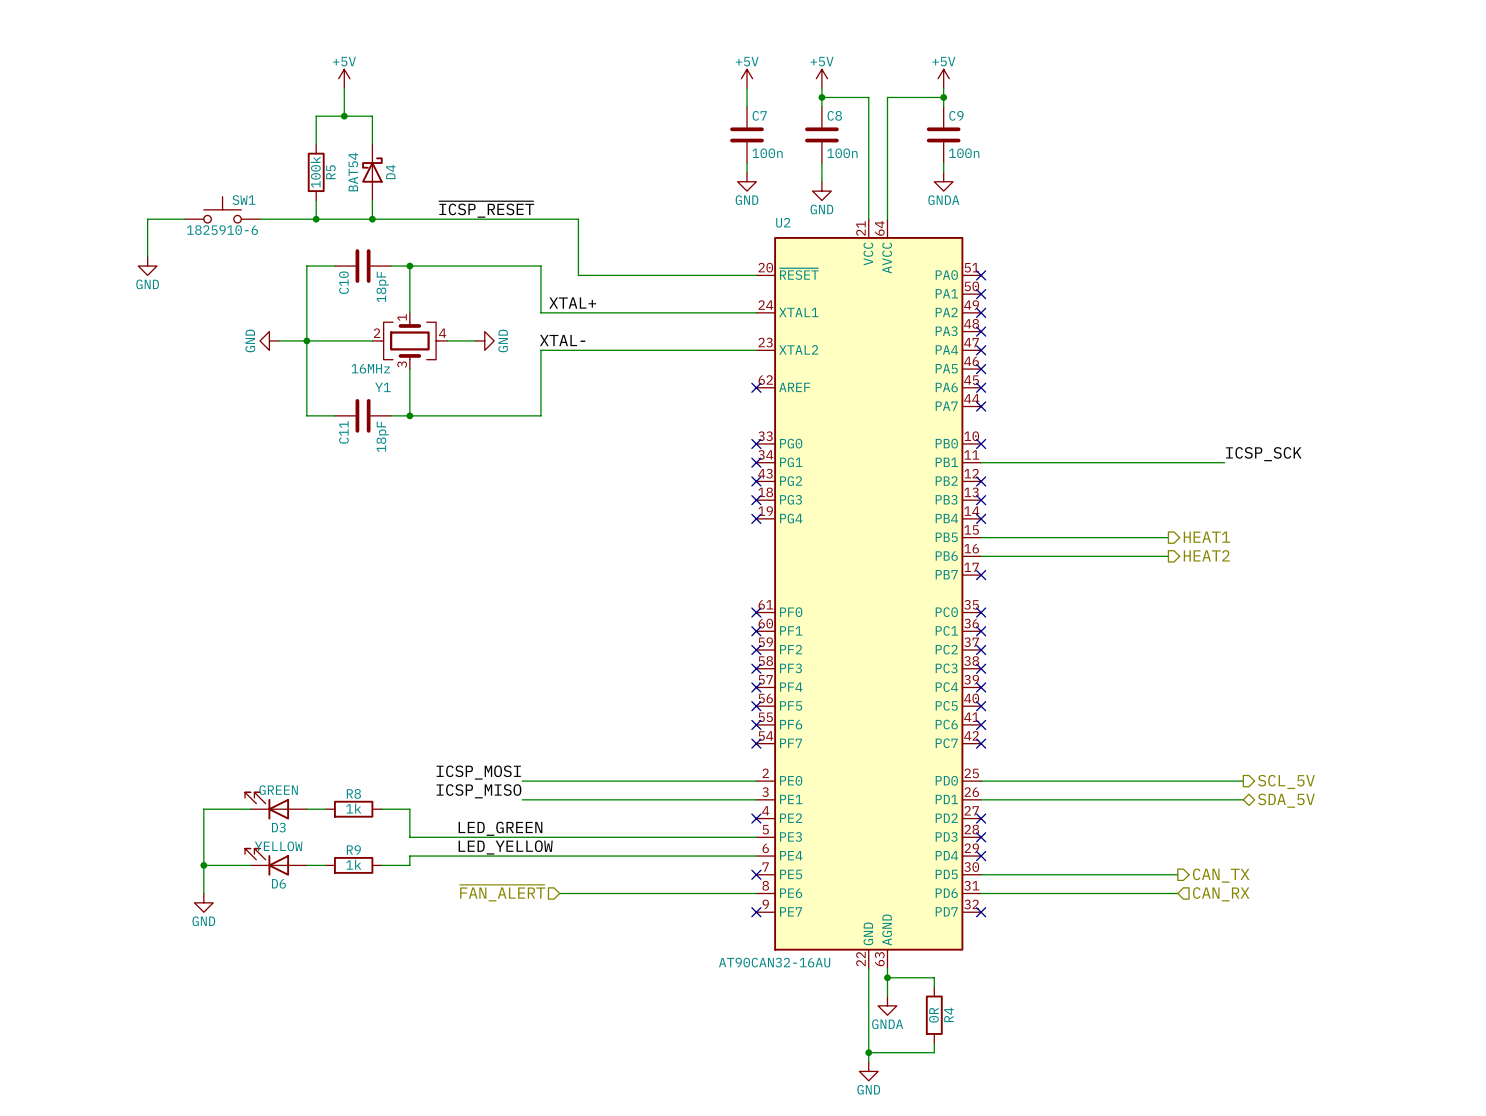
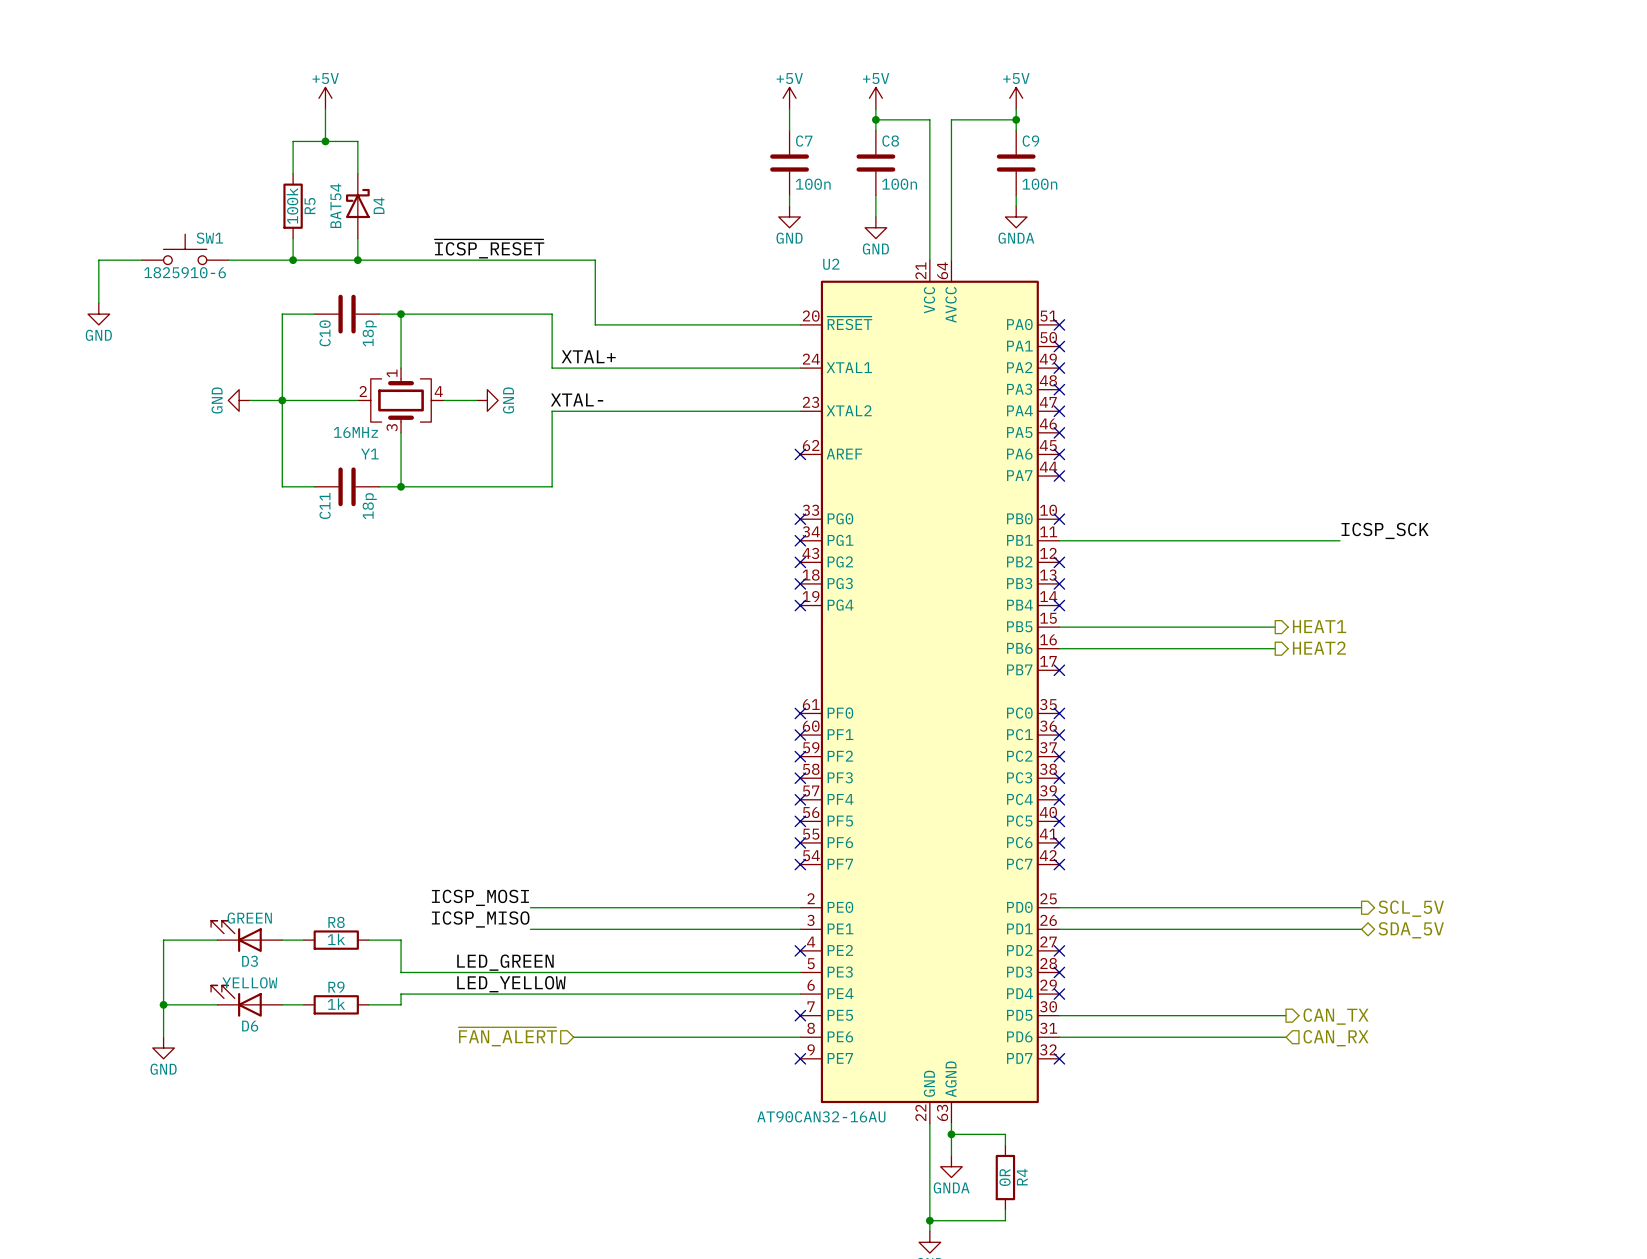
C10 value: 18pF (382, 286) -> 18p (369, 333)
C11 value: 18pF (382, 436) -> 18p (369, 506)

